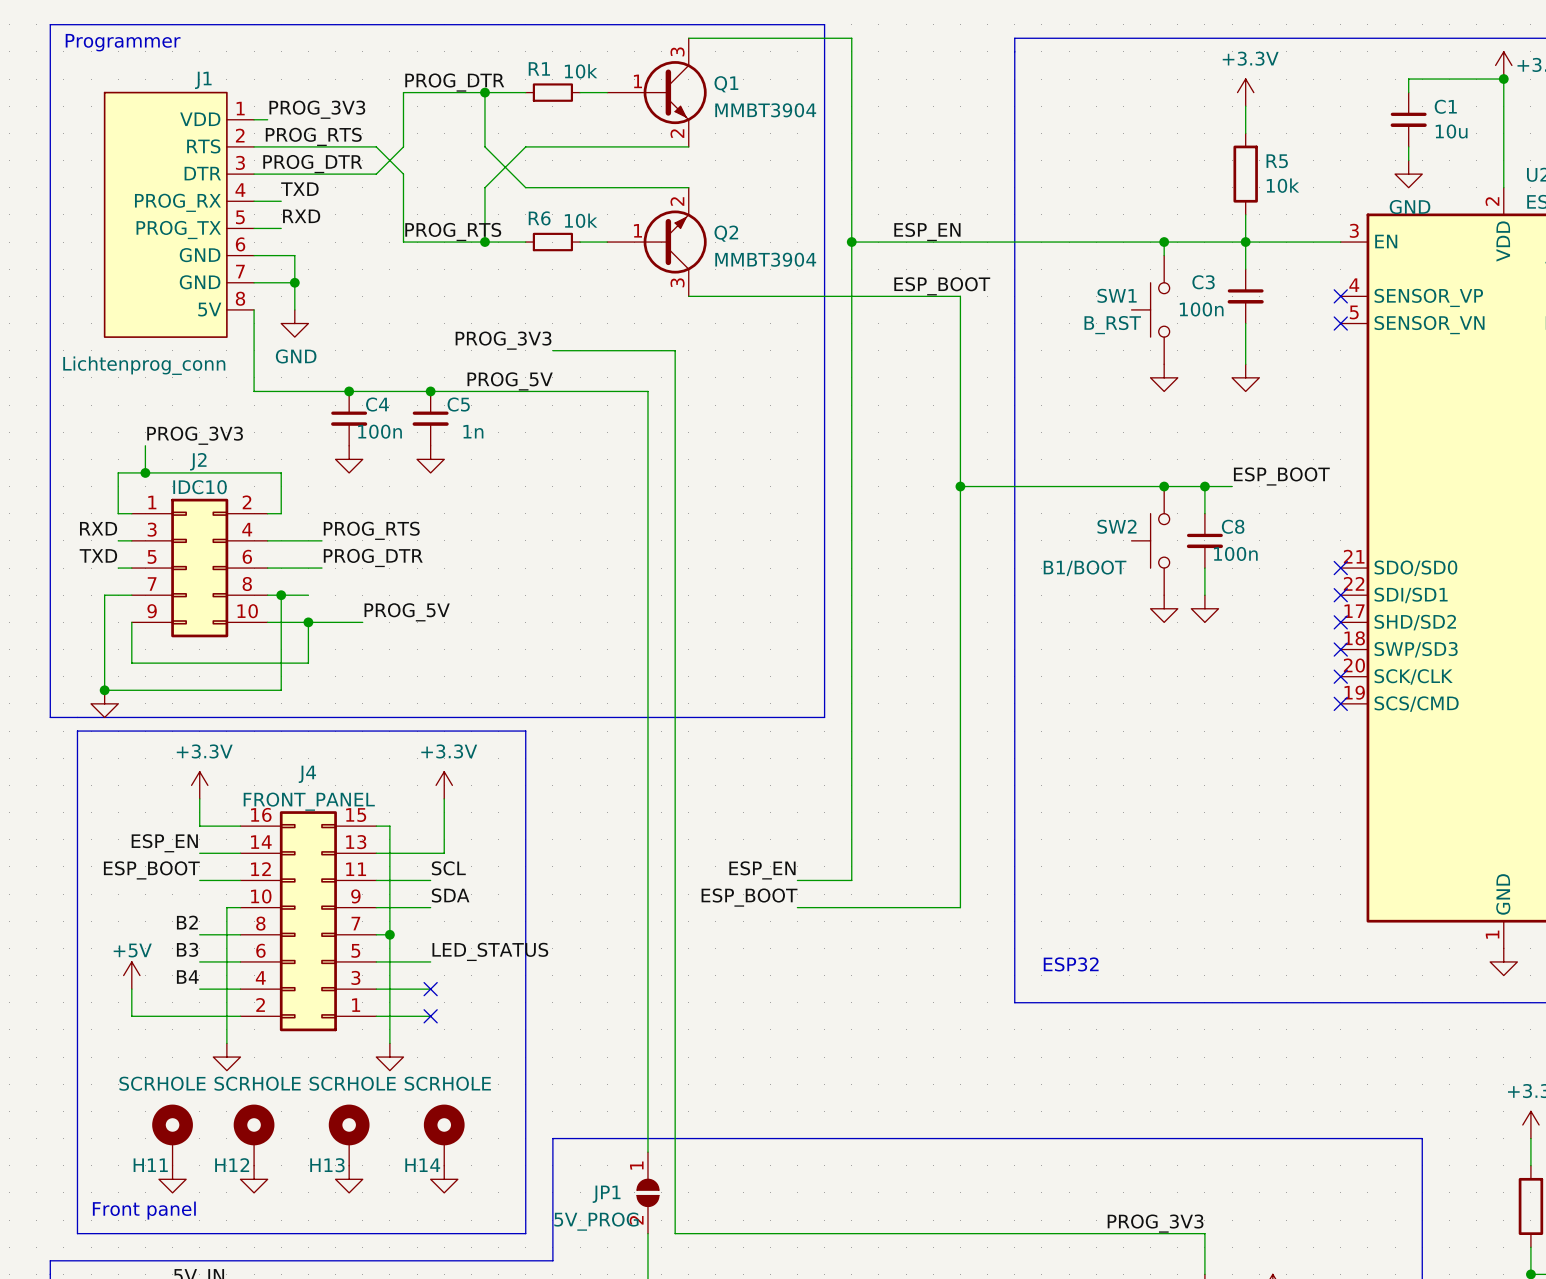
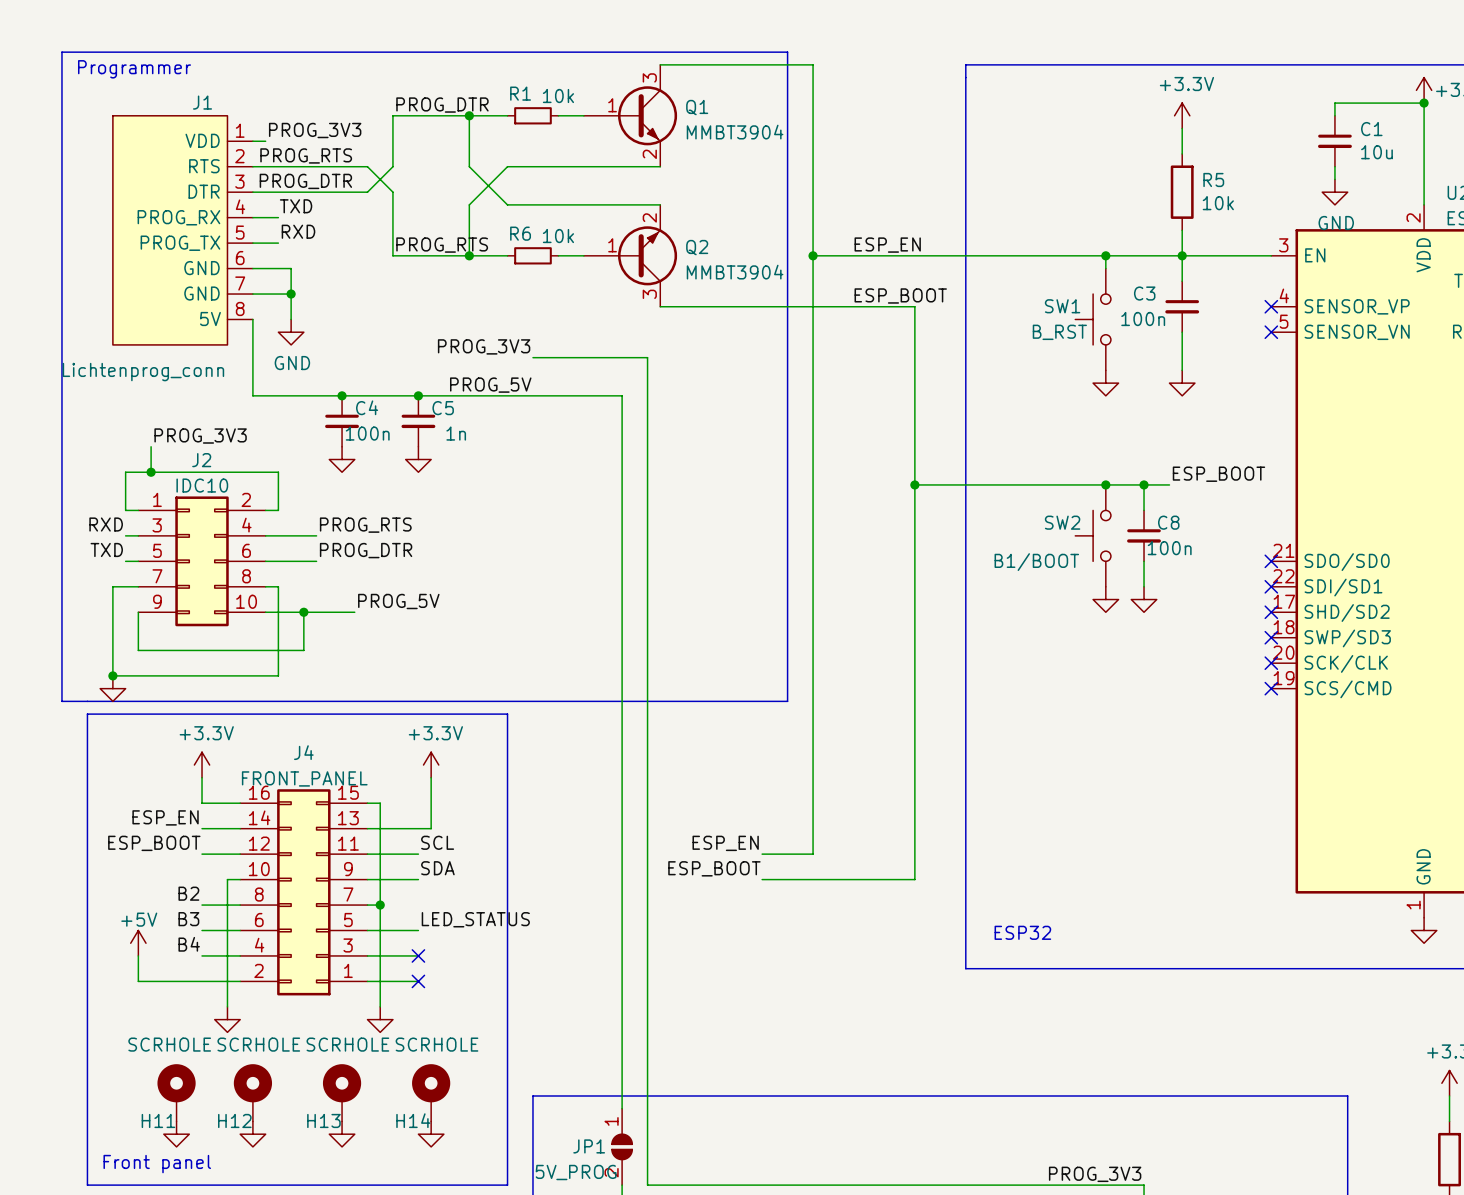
wire: (281, 595) (308, 595) -> none
junction: (281, 595) -> none

